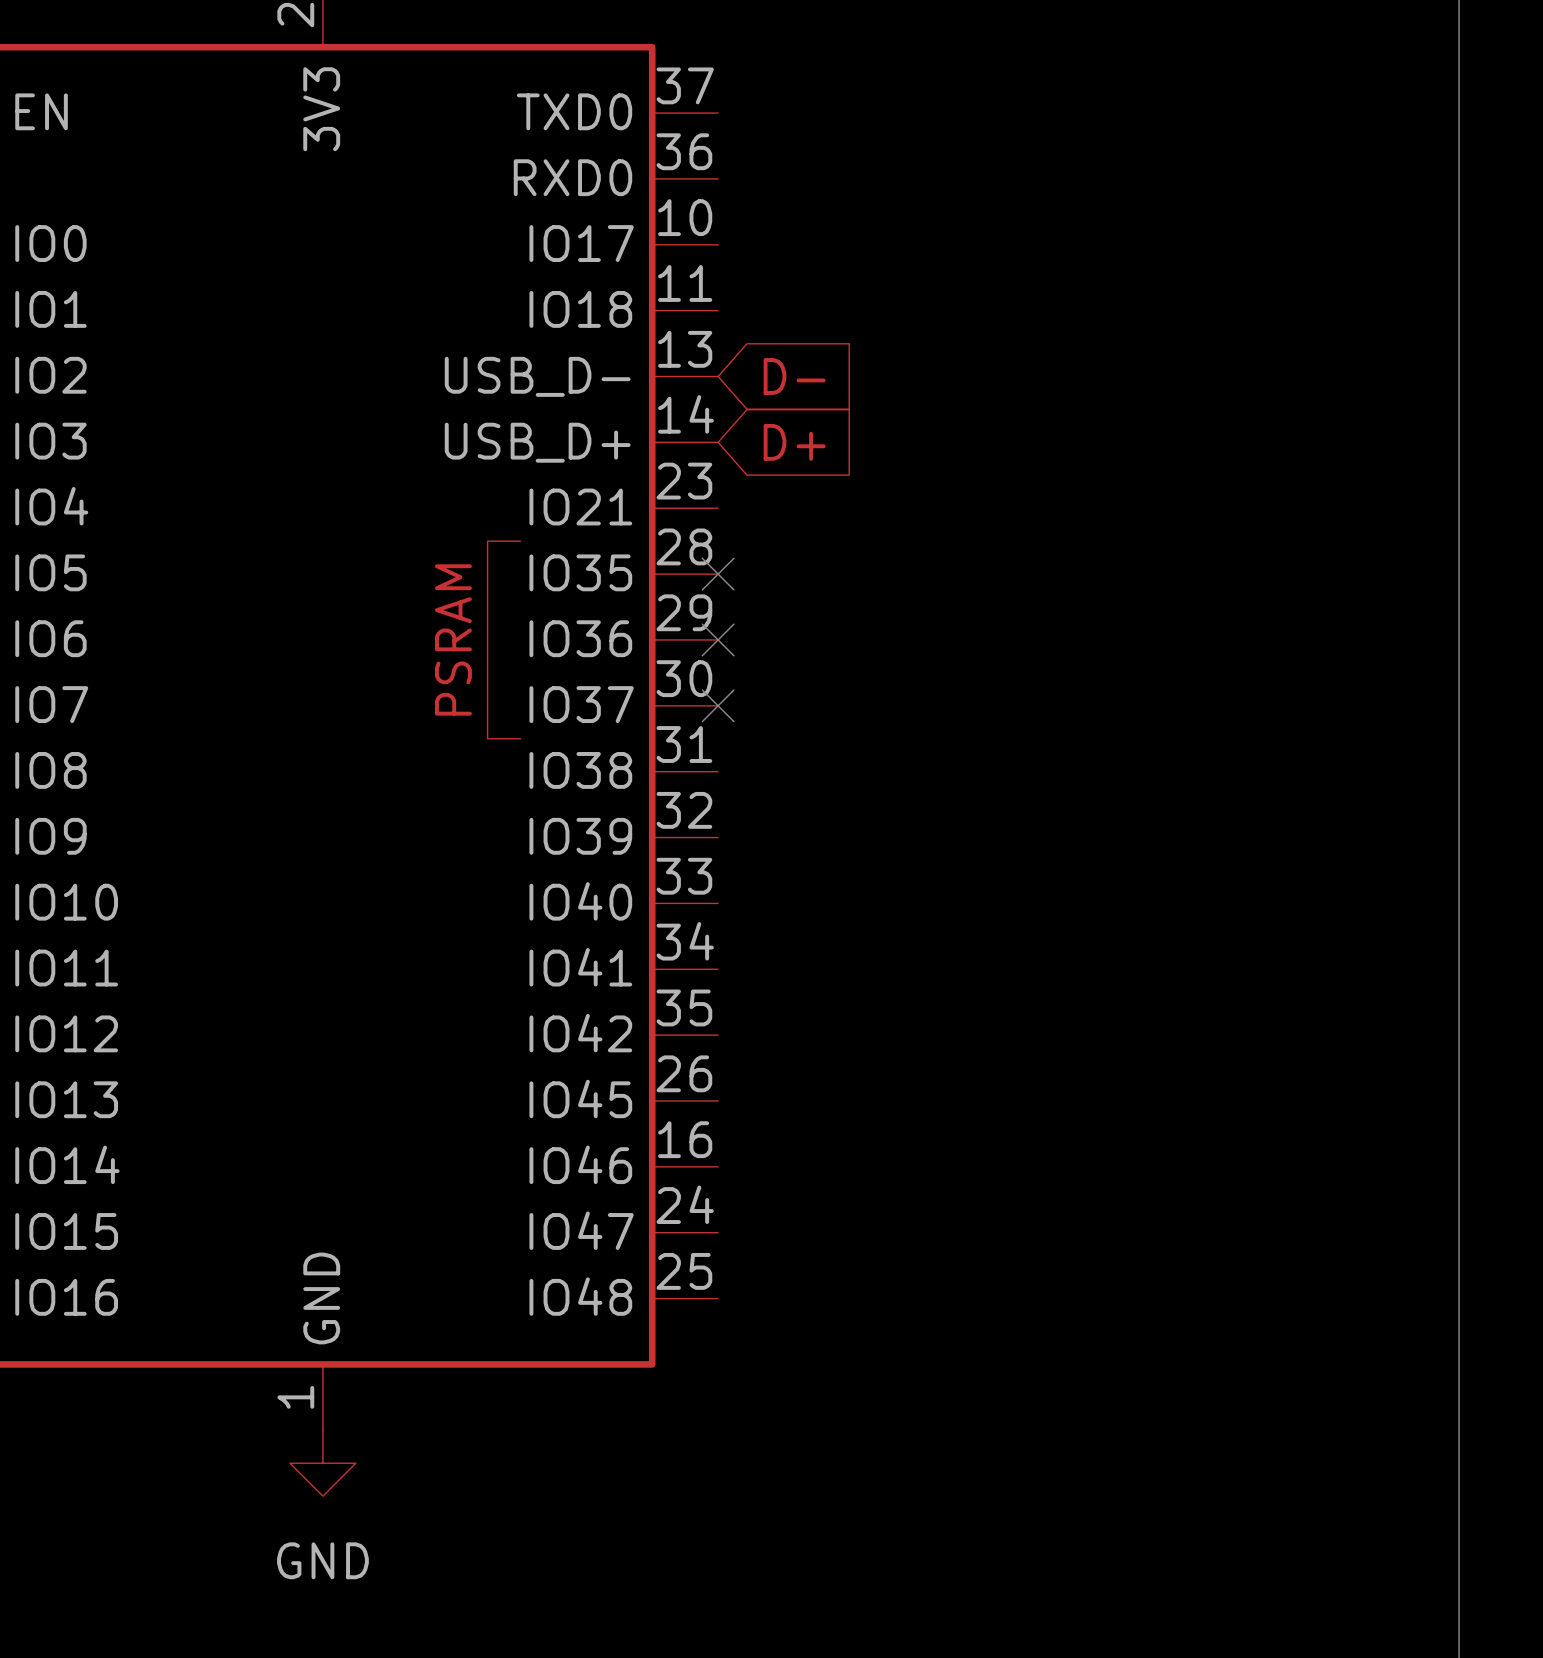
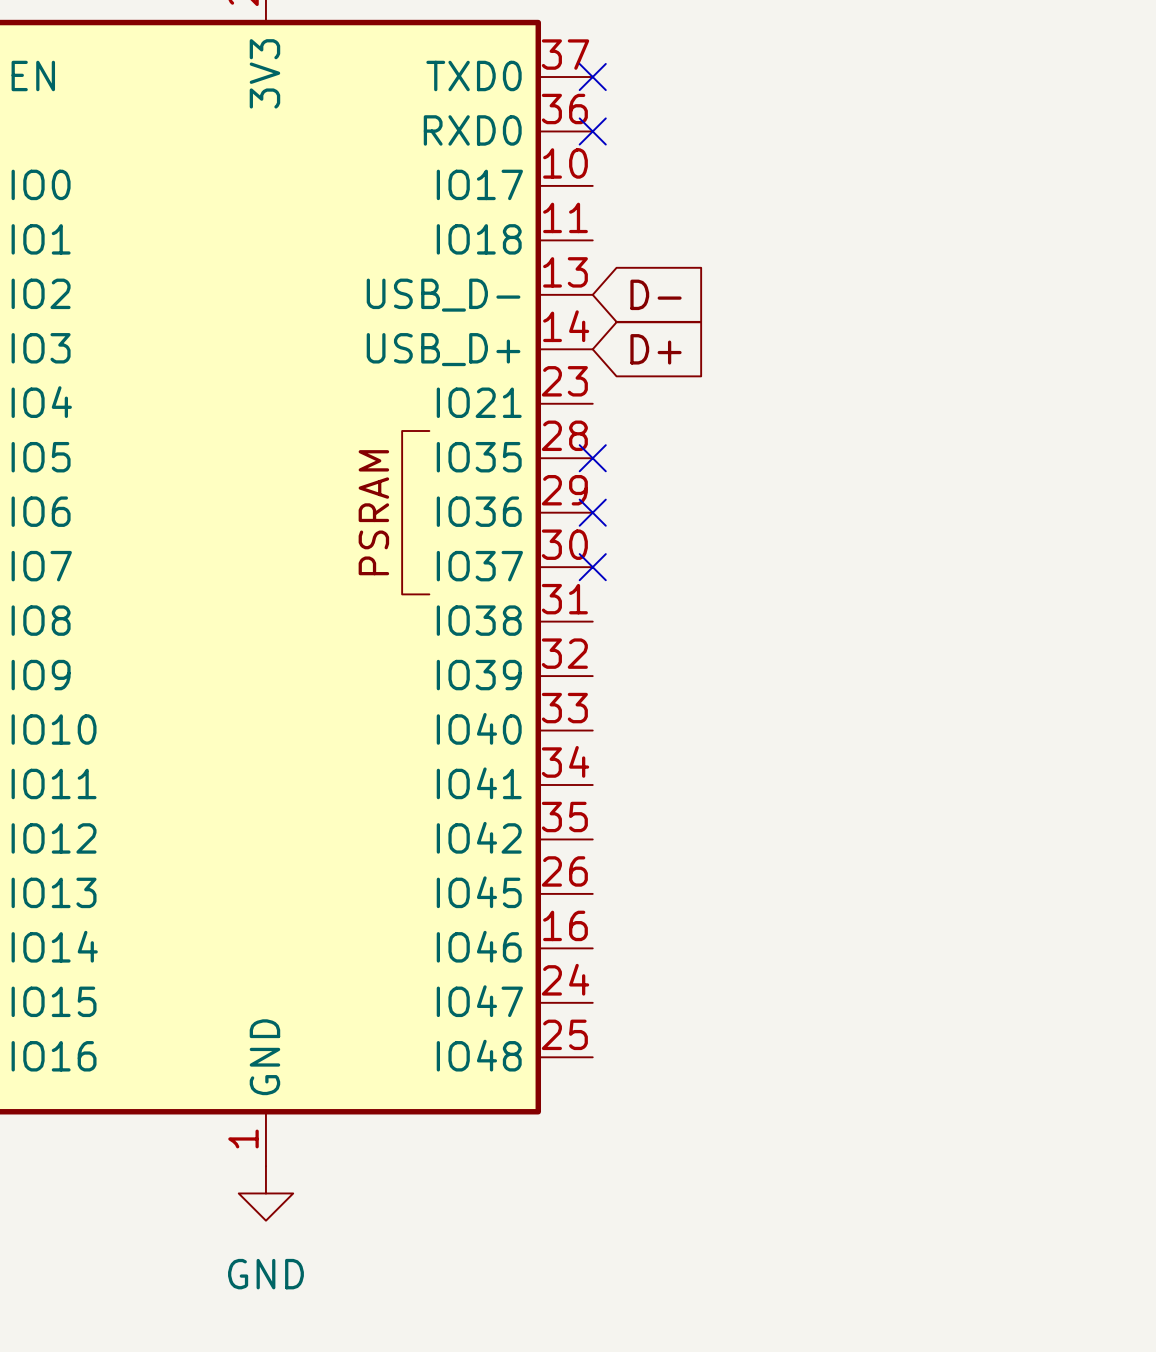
no-connect mark: none -> (592, 77)
no-connect mark: none -> (592, 131)

